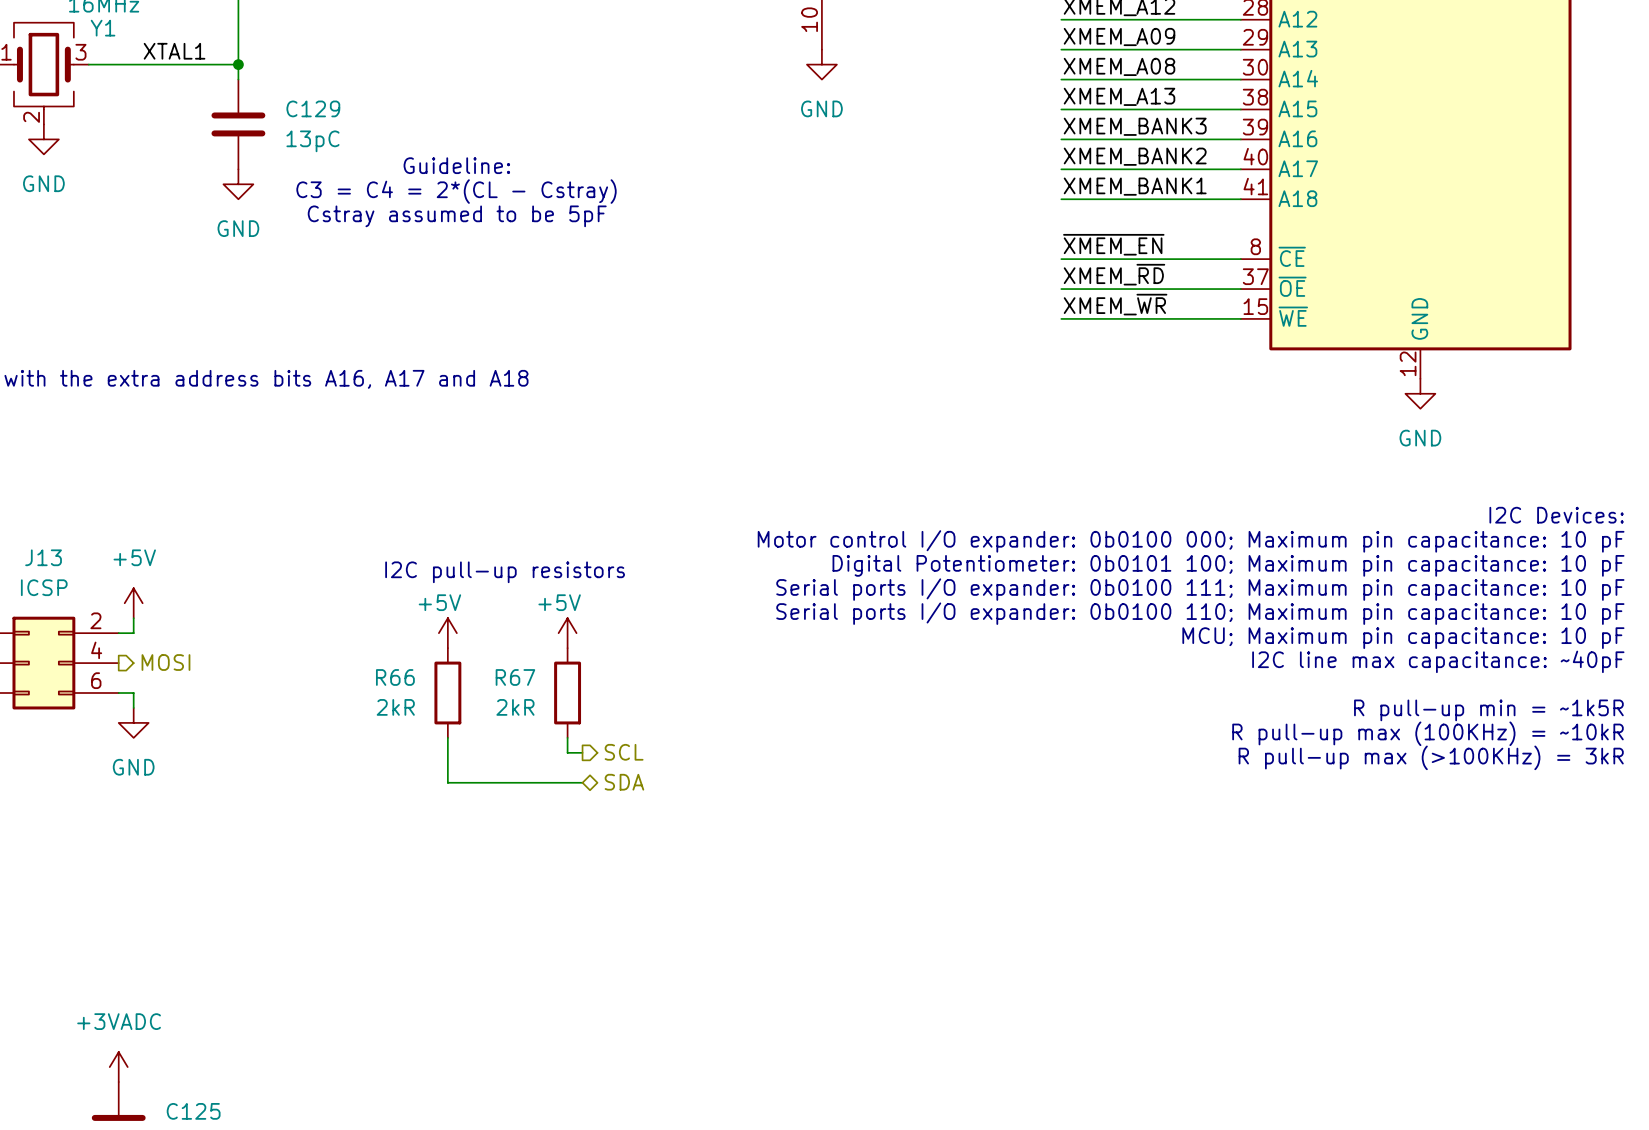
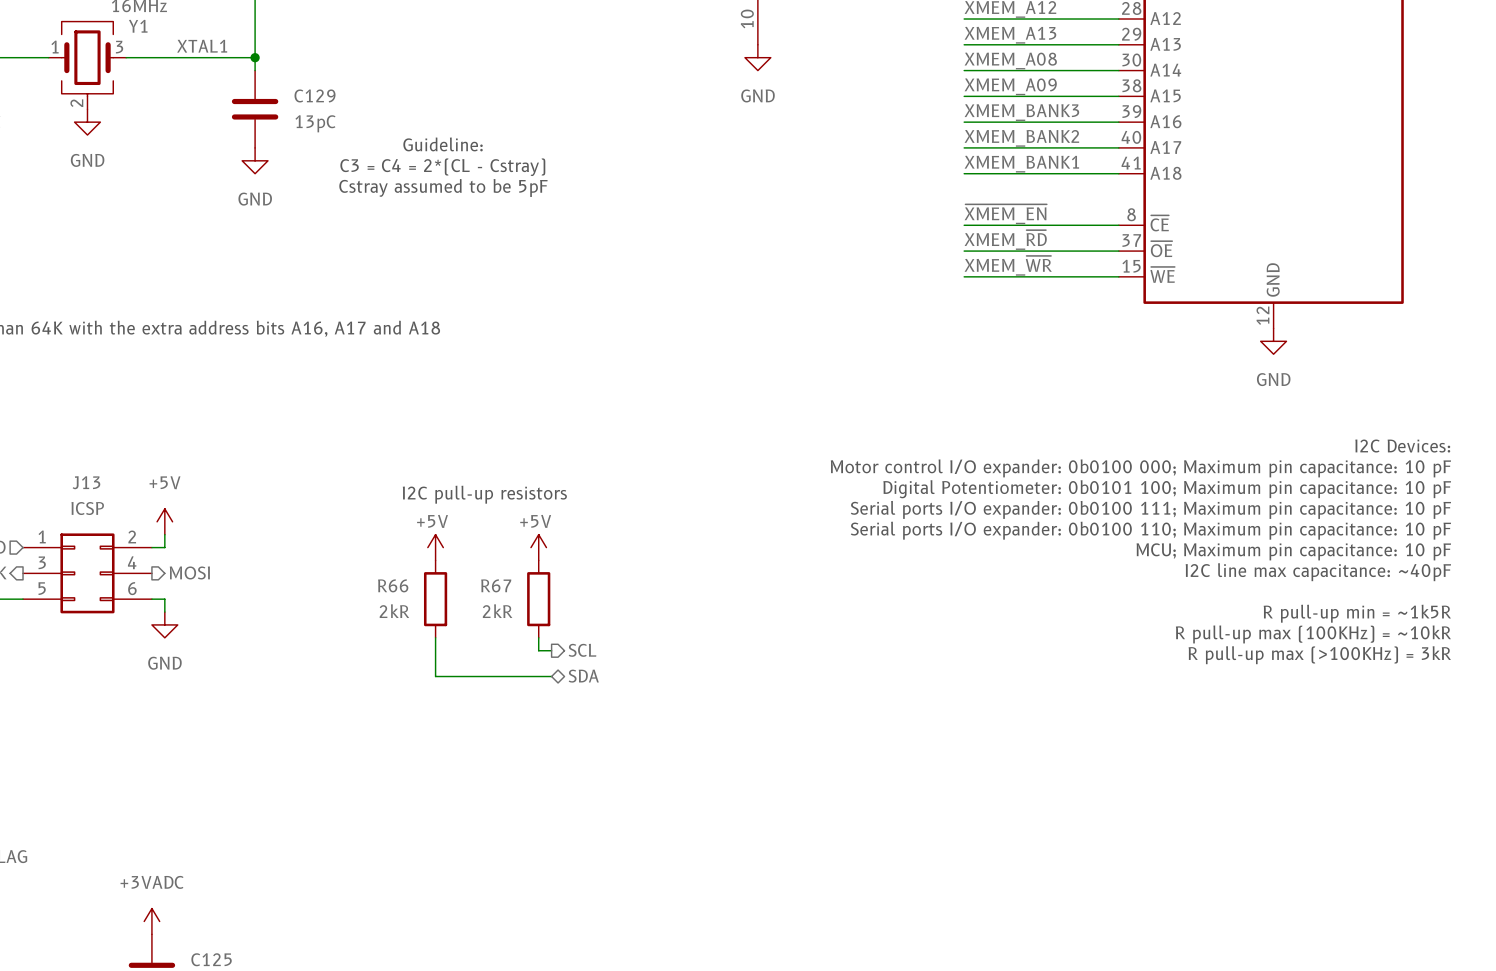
label: XMEM_A09 (1119, 37) -> XMEM_A13 (1010, 35)
label: XMEM_A13 (1119, 96) -> XMEM_A09 (1010, 86)

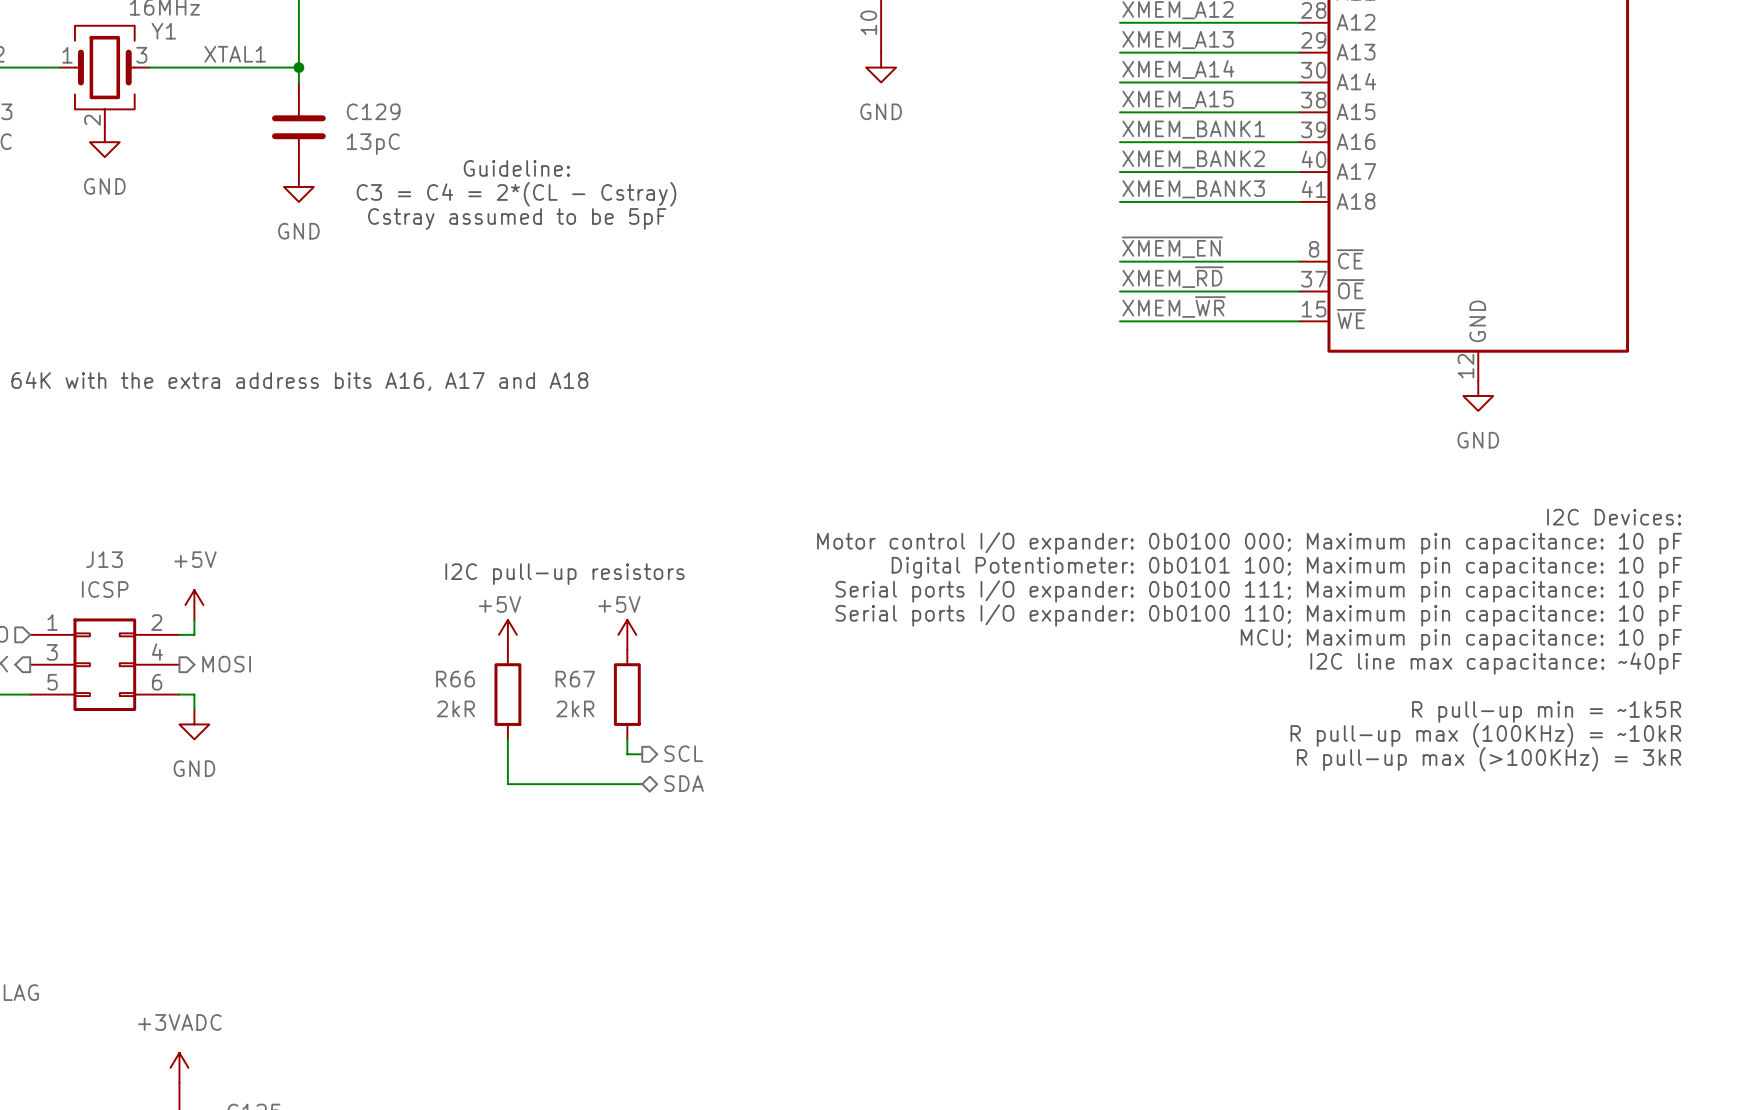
label: XMEM_A08 (1010, 61) -> XMEM_A14 (1178, 69)
label: XMEM_A09 (1010, 86) -> XMEM_A15 (1178, 99)
label: XMEM_BANK3 (1021, 112) -> XMEM_BANK1 (1193, 129)
label: XMEM_BANK1 (1021, 164) -> XMEM_BANK3 (1193, 189)

